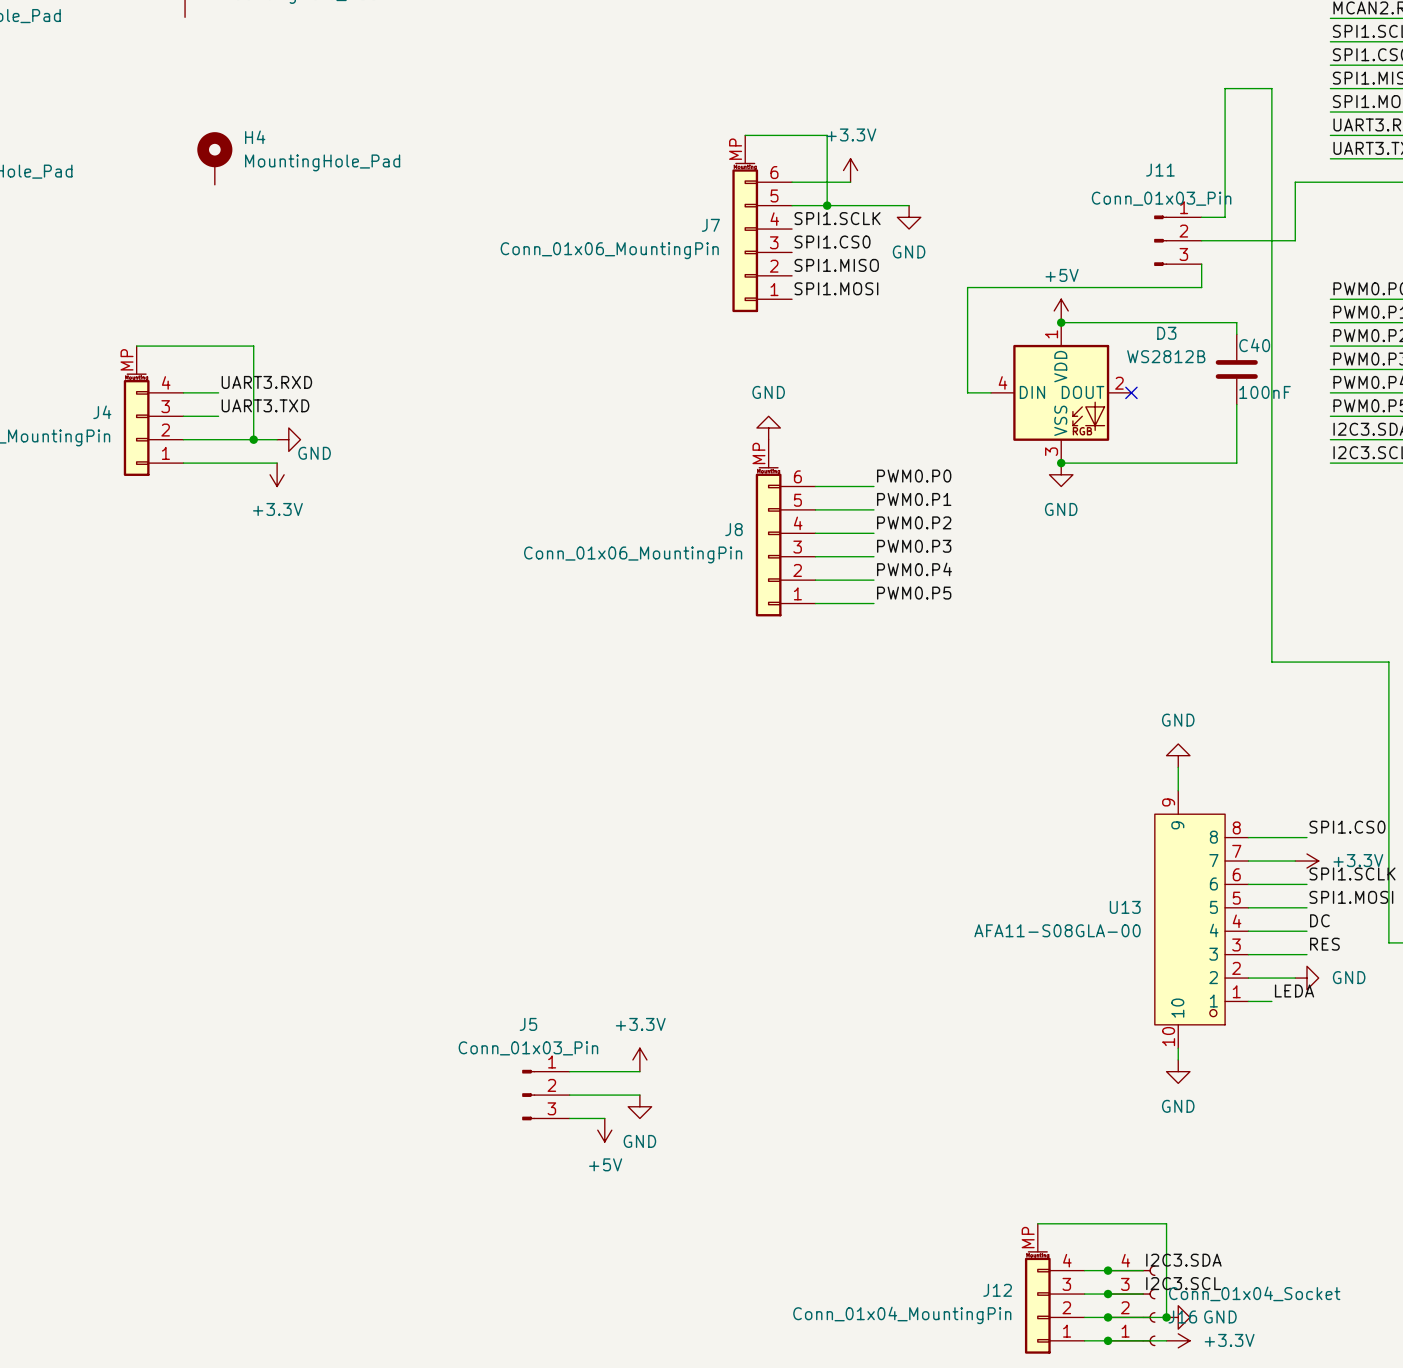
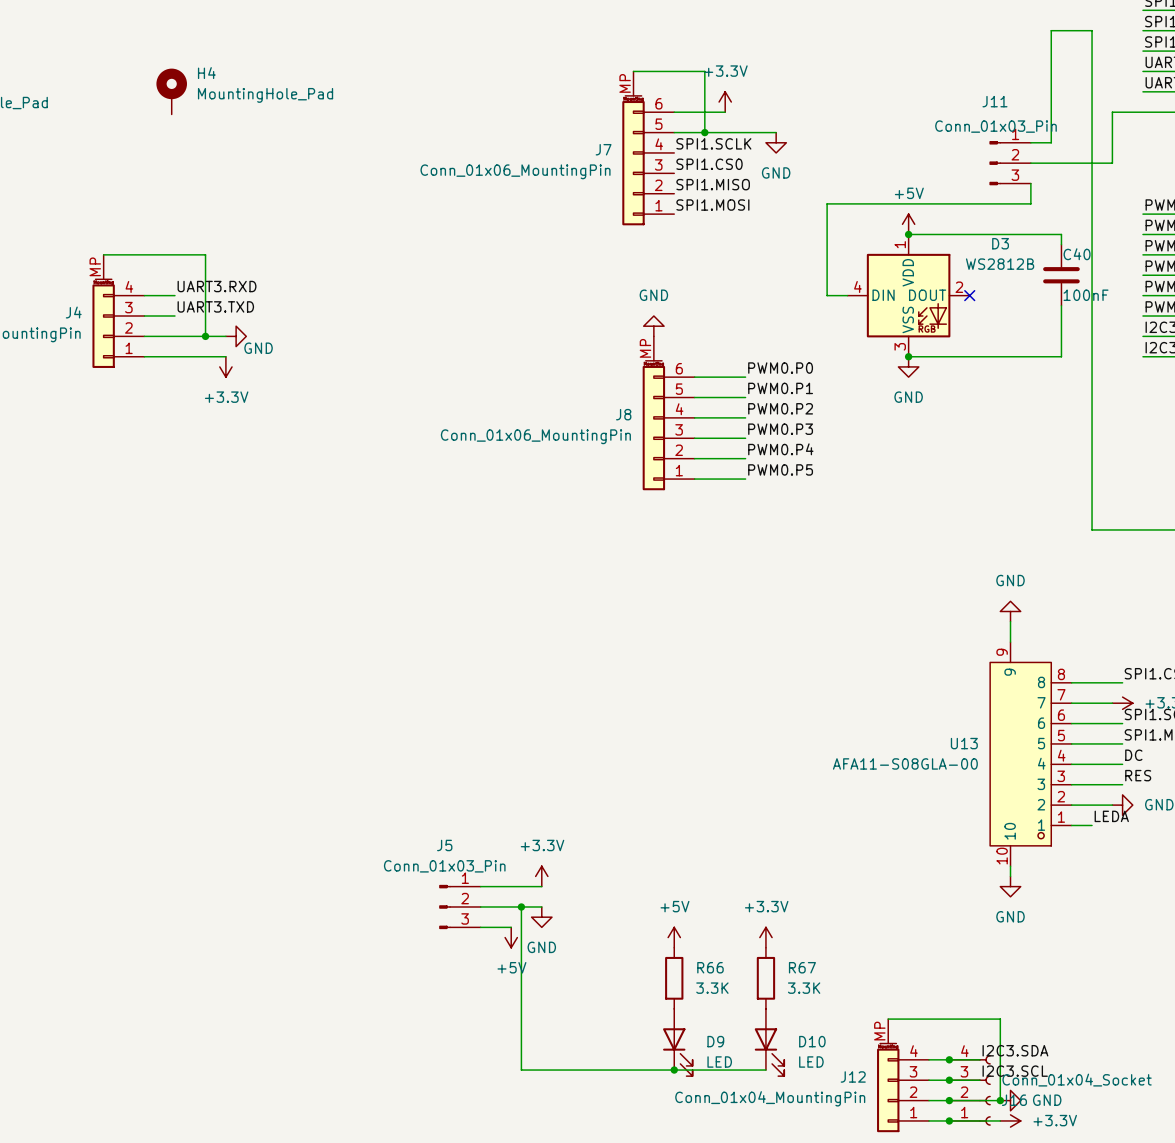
wire: none -> (521, 906) (521, 1070) (765, 1070)
junction: none -> (521, 906)
power symbol: none -> +5V (674, 937)
power symbol: none -> +3.3V (765, 937)
R66: none -> 3.3K (674, 978)
R67: none -> 3.3K (765, 978)
D9: none -> LED (677, 1042)
D10: none -> LED (769, 1042)
junction: none -> (674, 1070)

